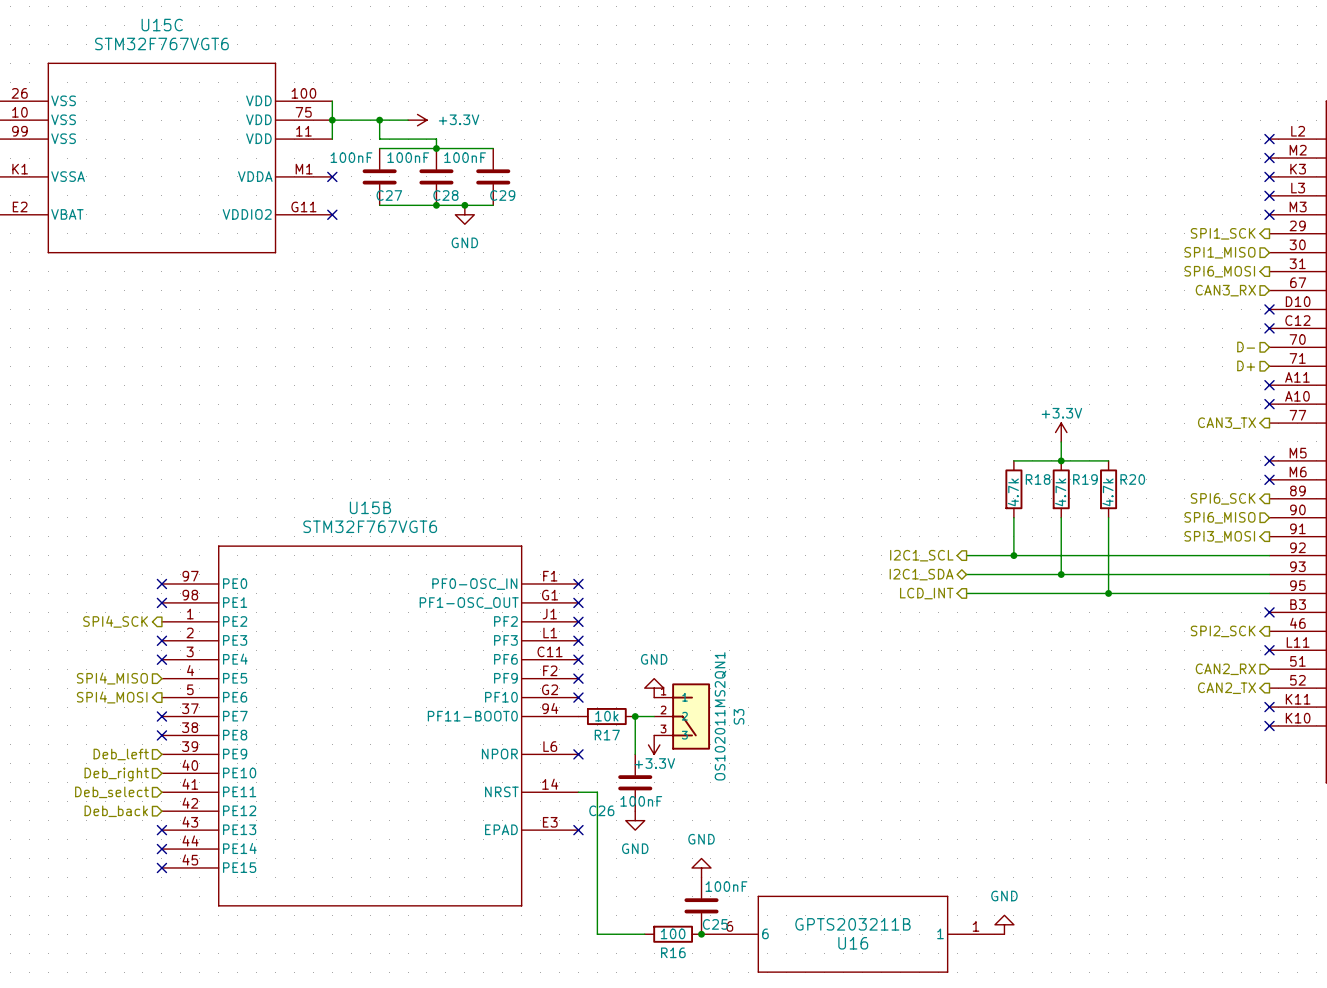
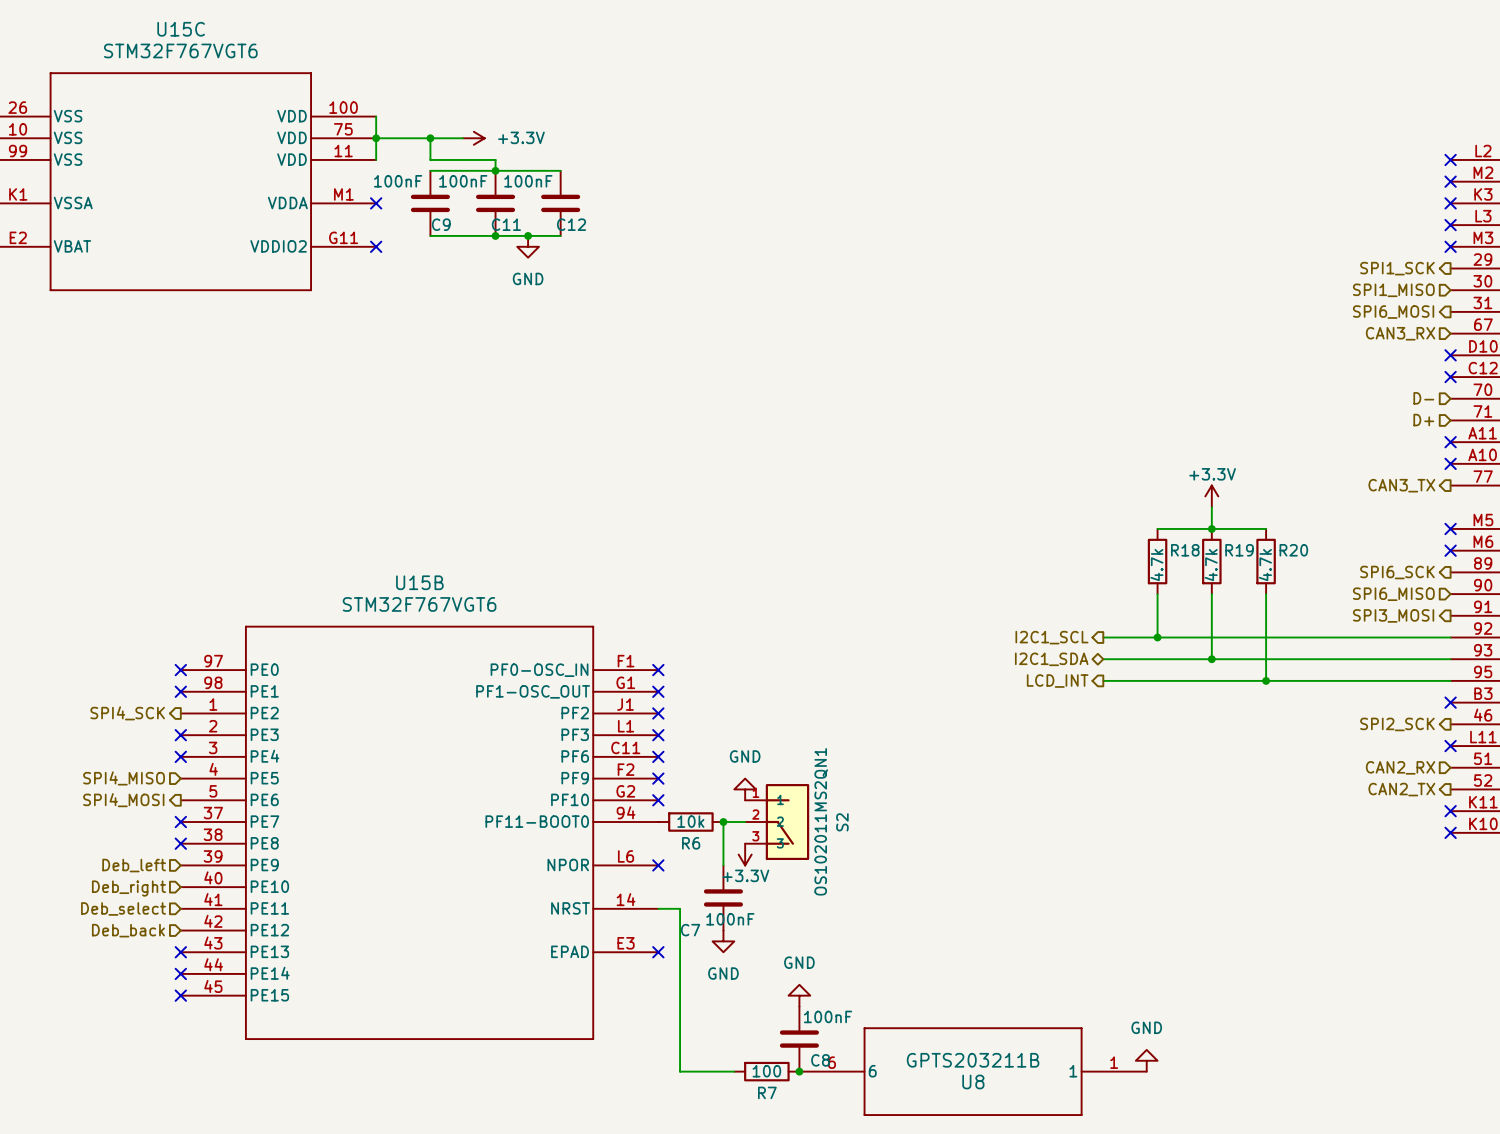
C27 name: C27 (389, 195) -> C9 (441, 224)
C28 name: C28 (445, 195) -> C11 (506, 224)
C29 name: C29 (502, 195) -> C12 (571, 224)
S3 name: S3 (739, 716) -> S2 (842, 822)
R17 name: R17 (607, 735) -> R6 (691, 843)
C26 name: C26 (601, 810) -> C7 (690, 930)
C25 name: C25 (715, 924) -> C8 (820, 1060)
U16 name: U16 (853, 943) -> U8 (973, 1081)
R16 name: R16 (673, 952) -> R7 (767, 1092)

